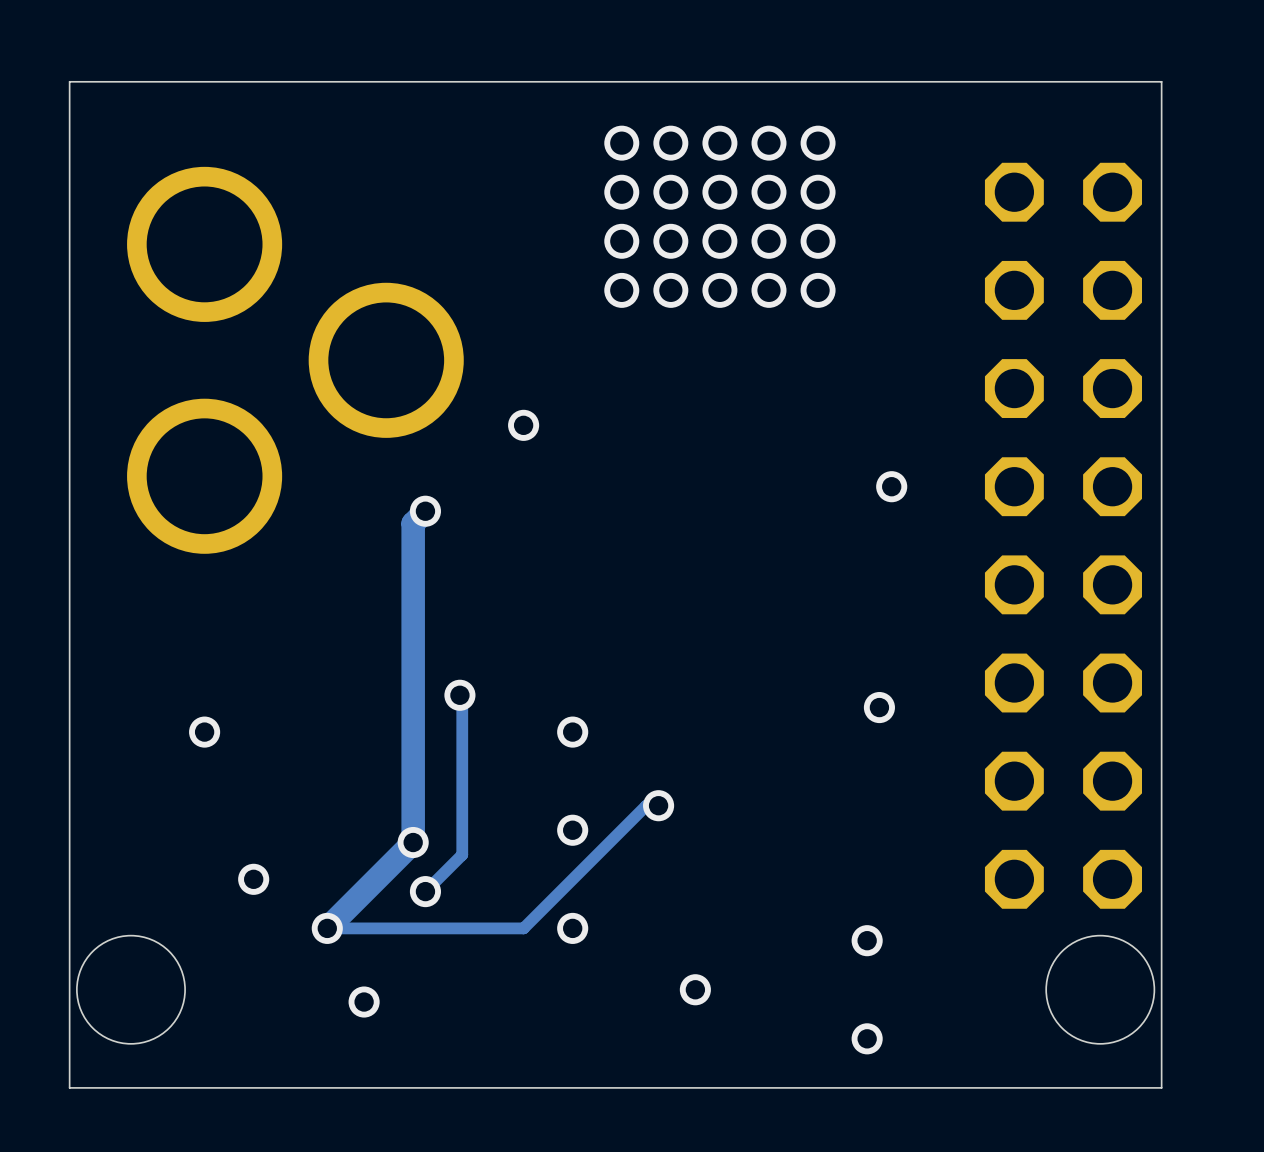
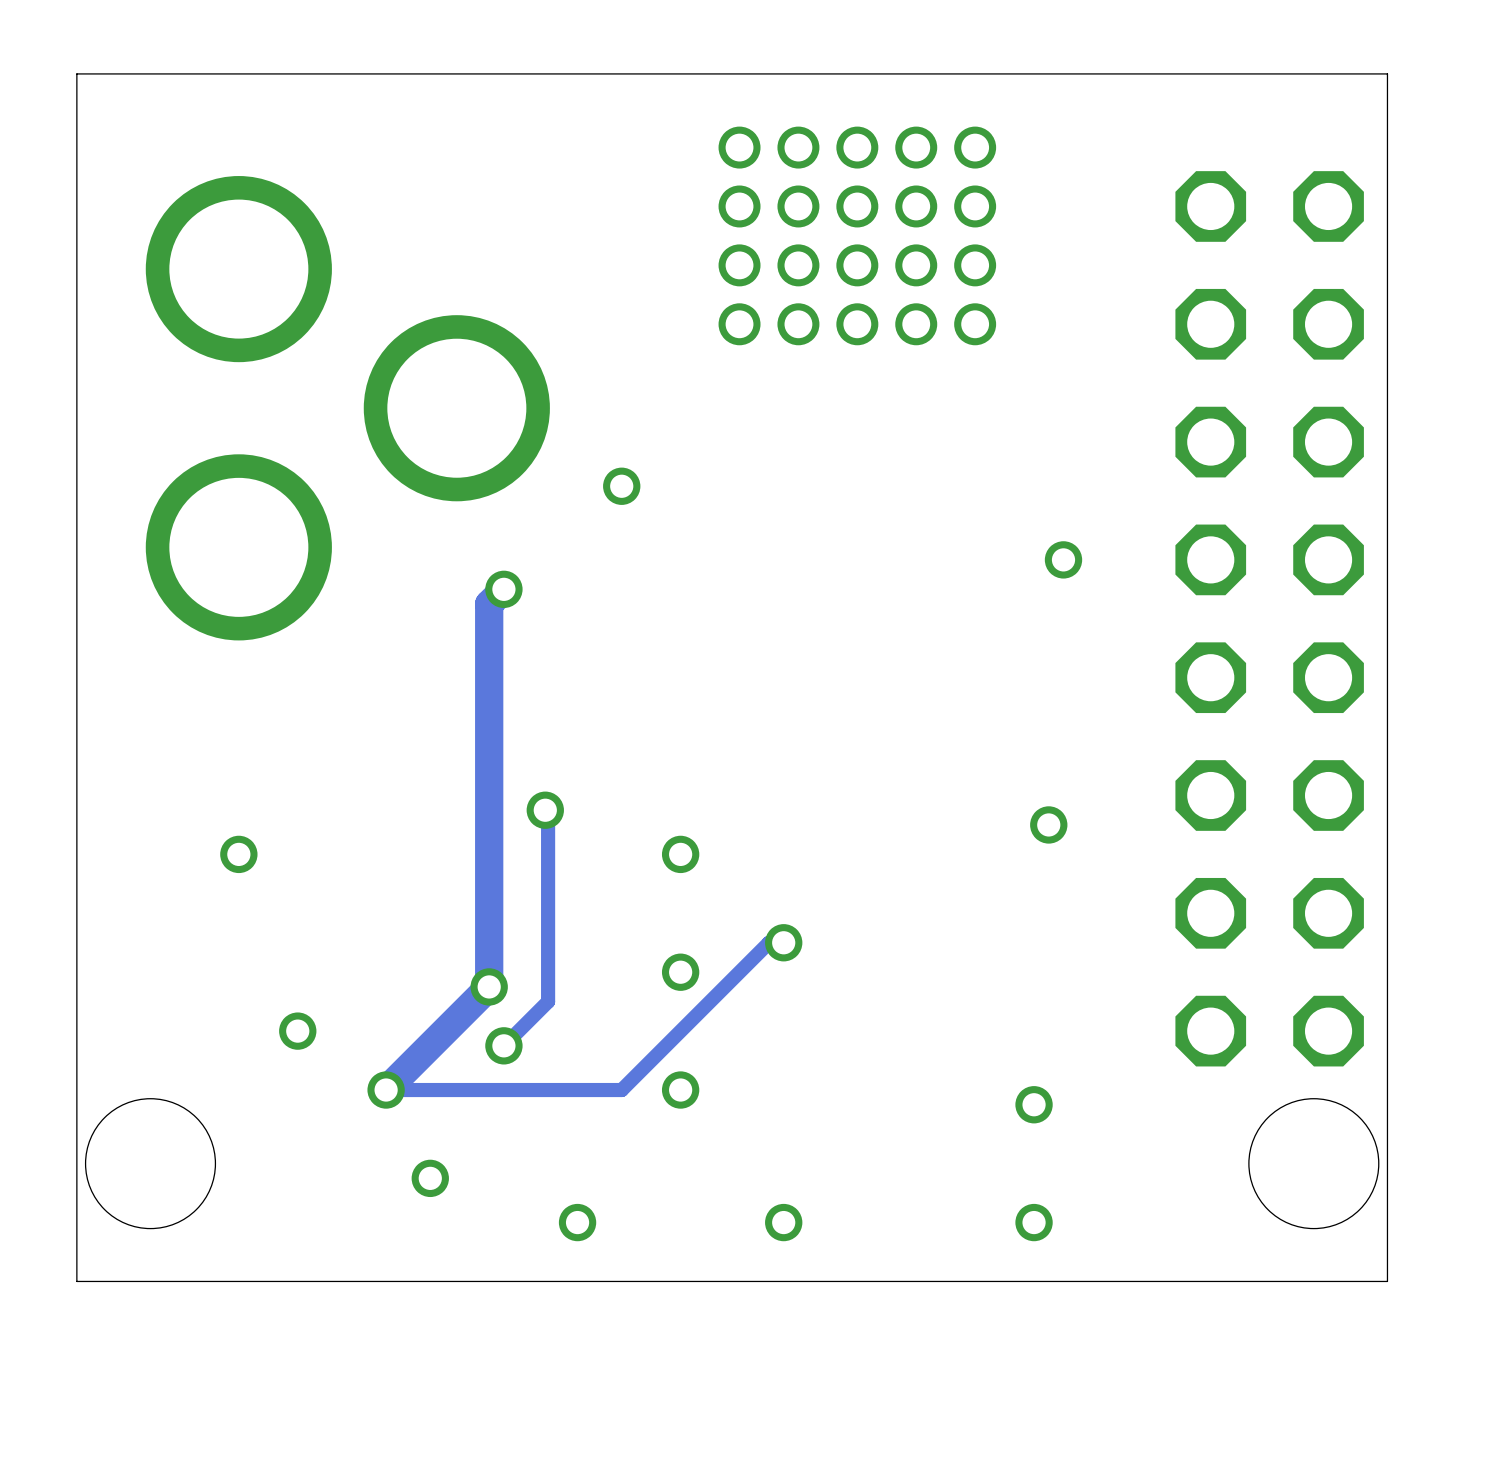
via position: (695, 989) -> (783, 1222)
via: none -> (577, 1222)

